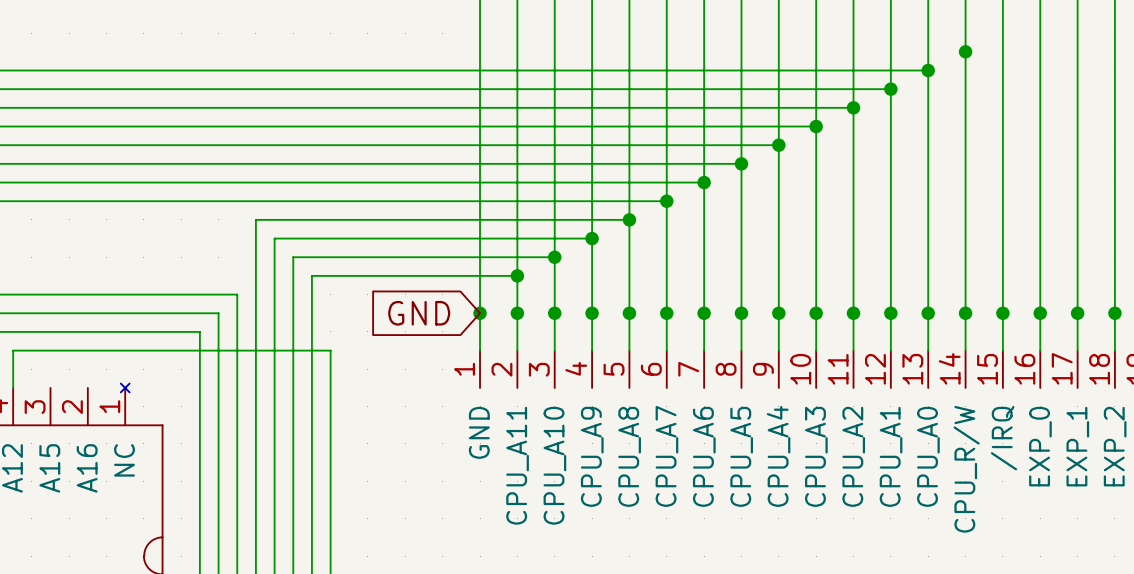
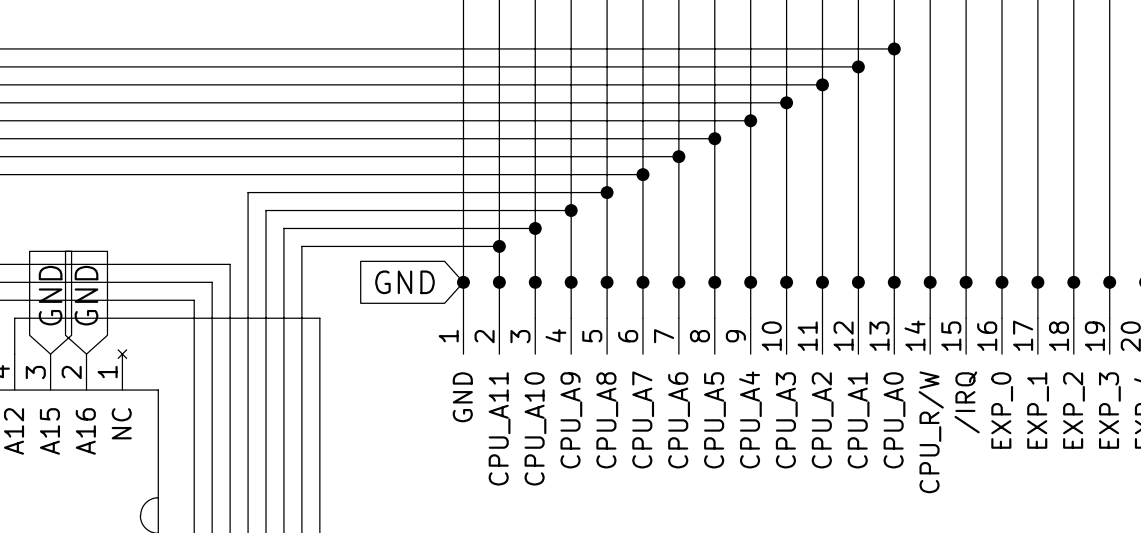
junction: (965, 51) -> none
global label: none -> GND (50, 295)
global label: none -> GND (86, 295)

